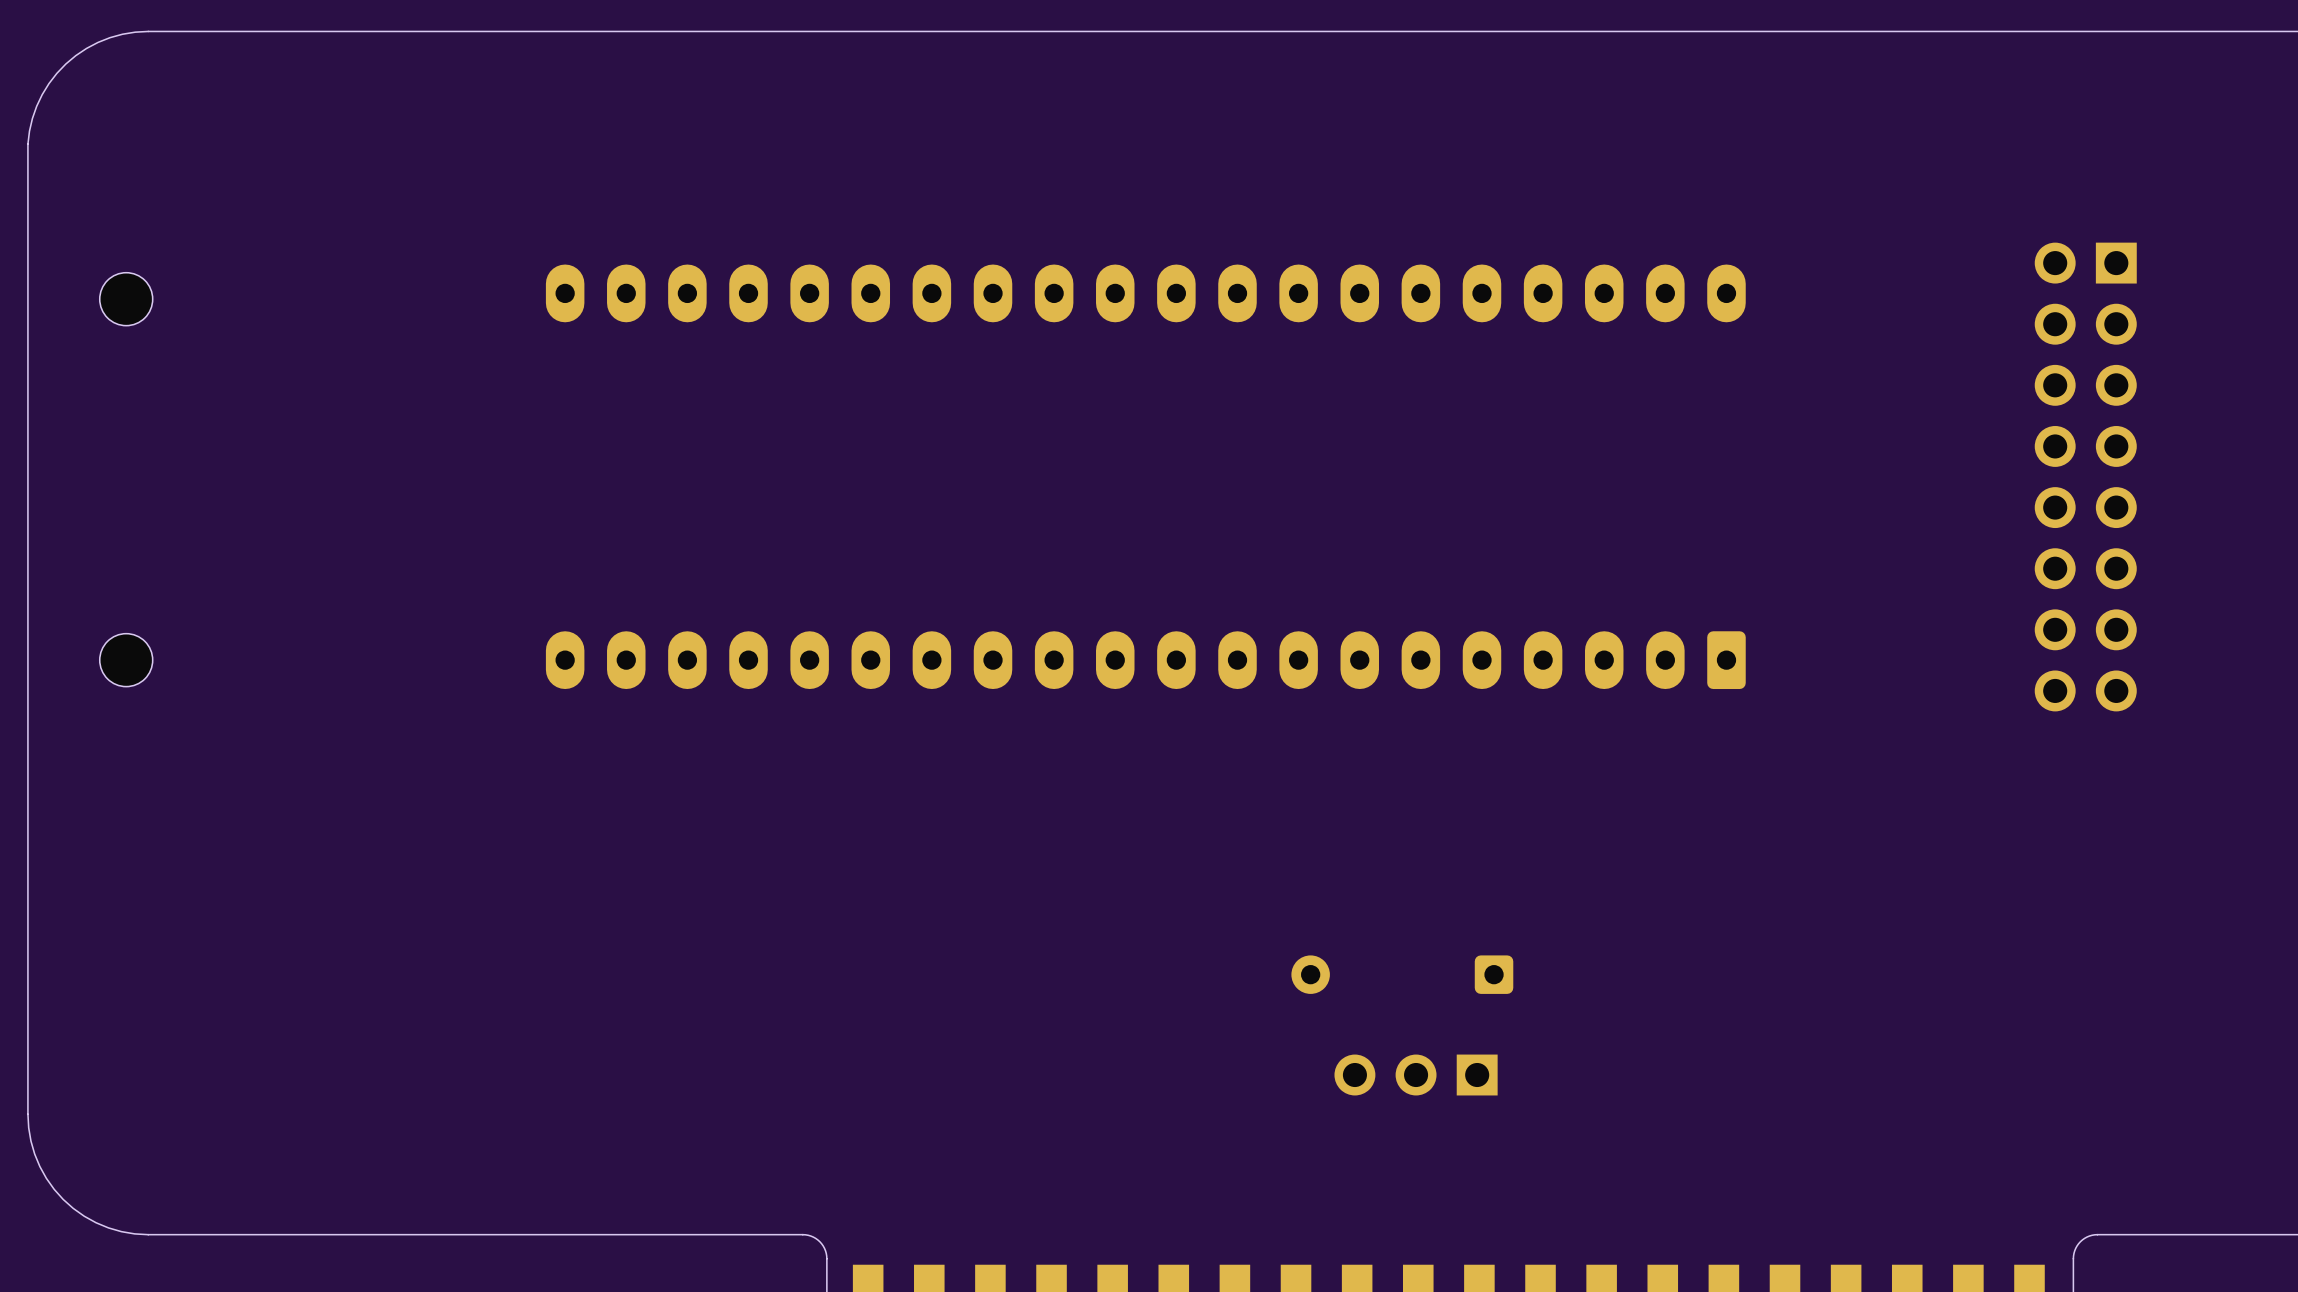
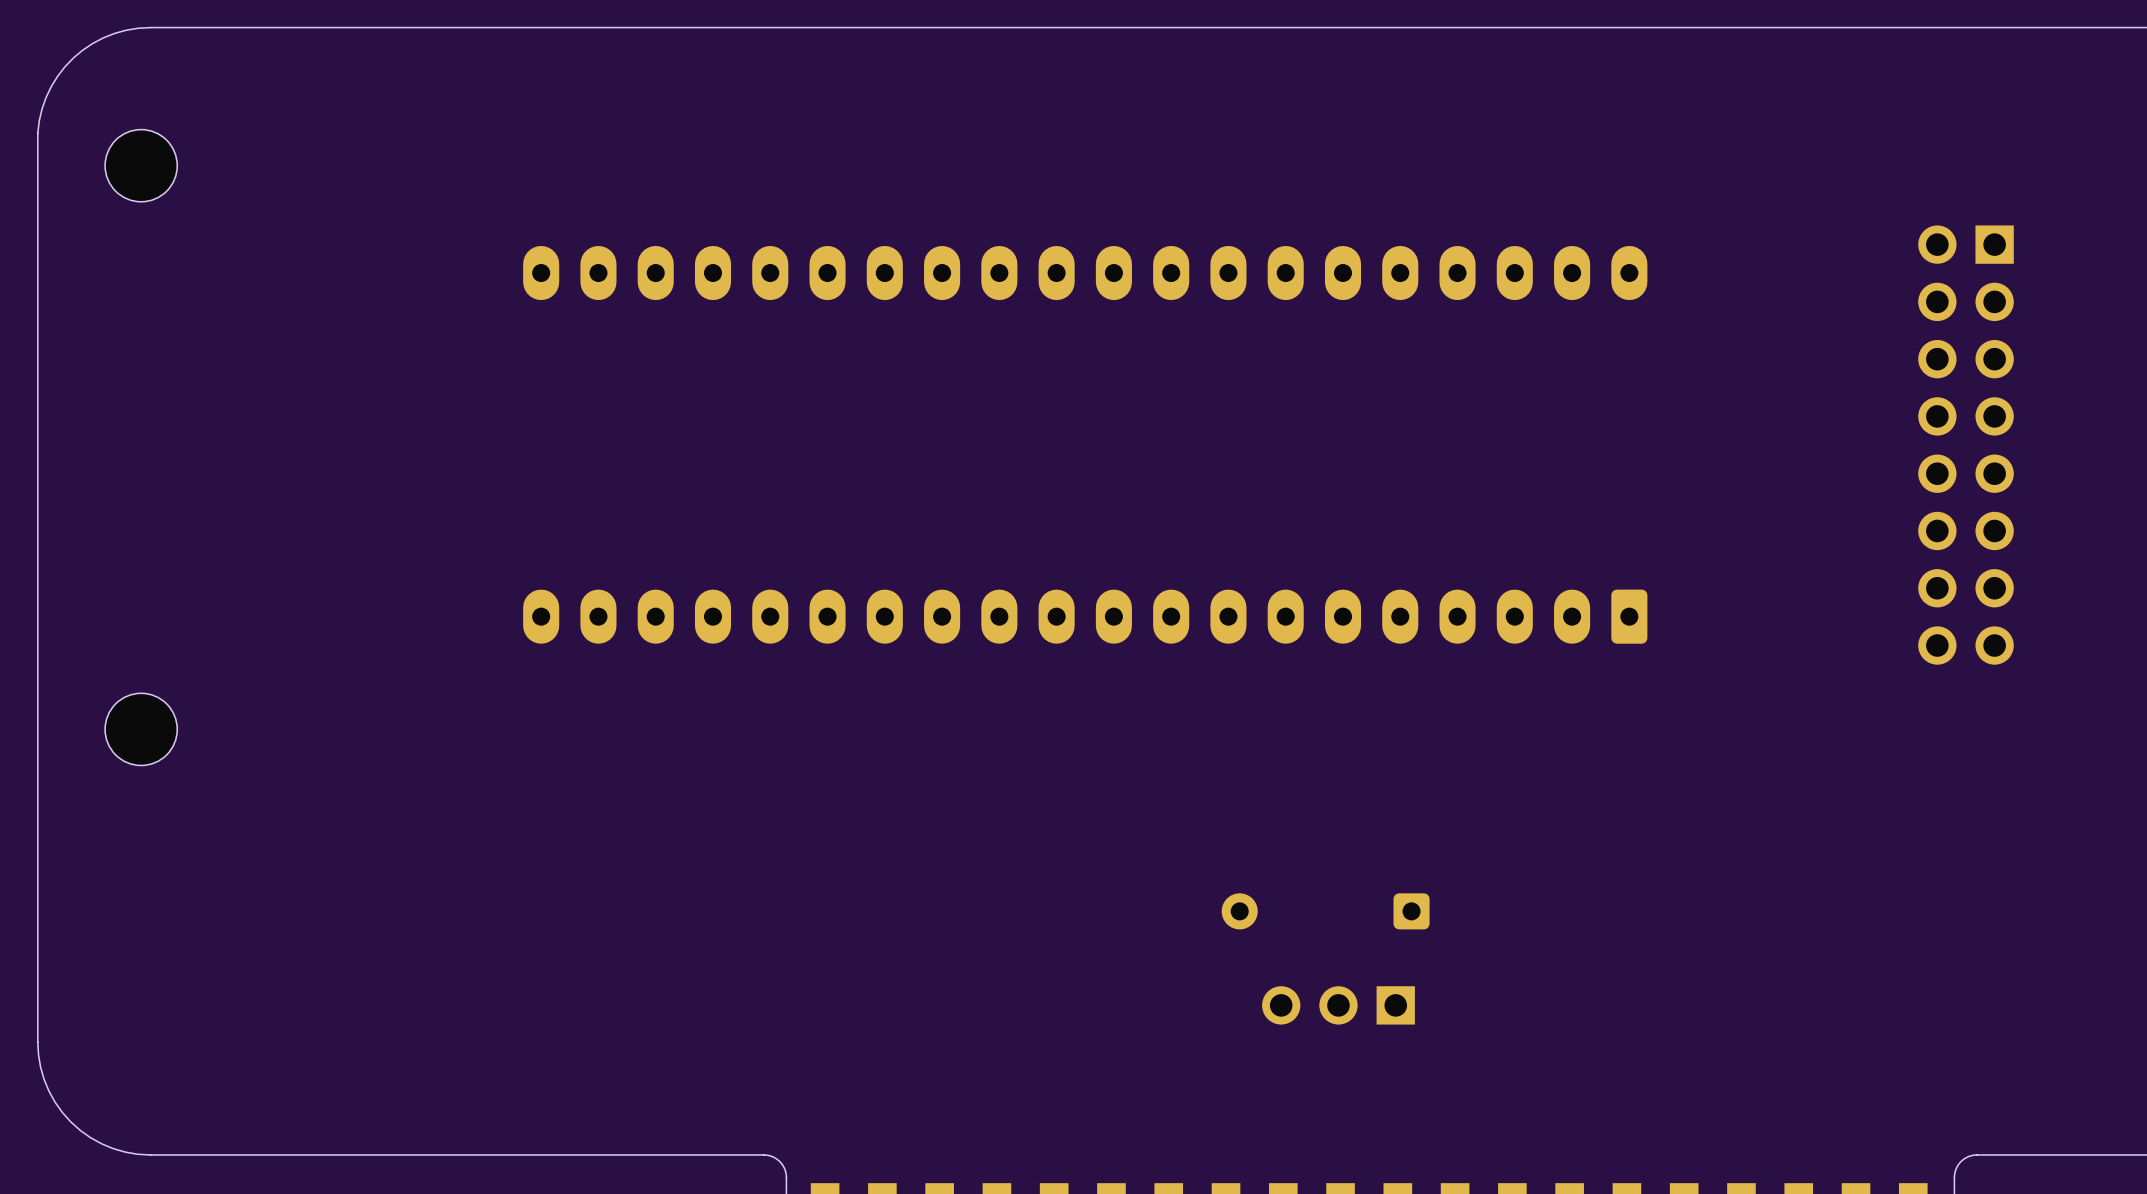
part: none -> (141, 165)
part: (126, 299) -> none
part: (126, 660) -> none
part: none -> (141, 729)

